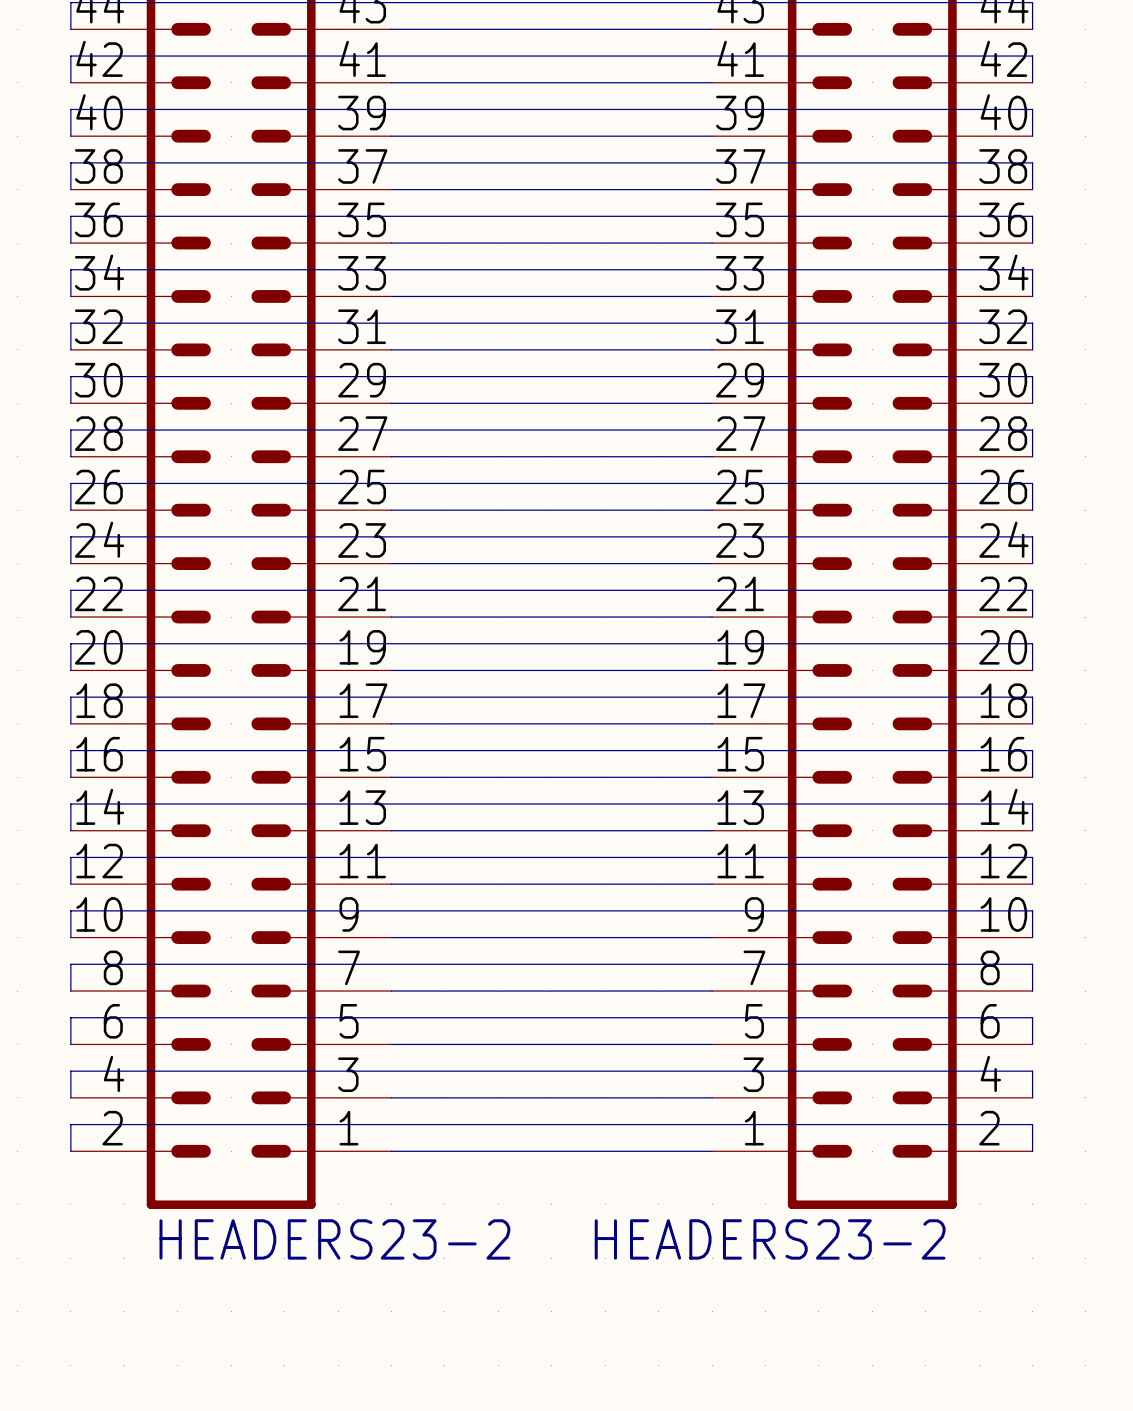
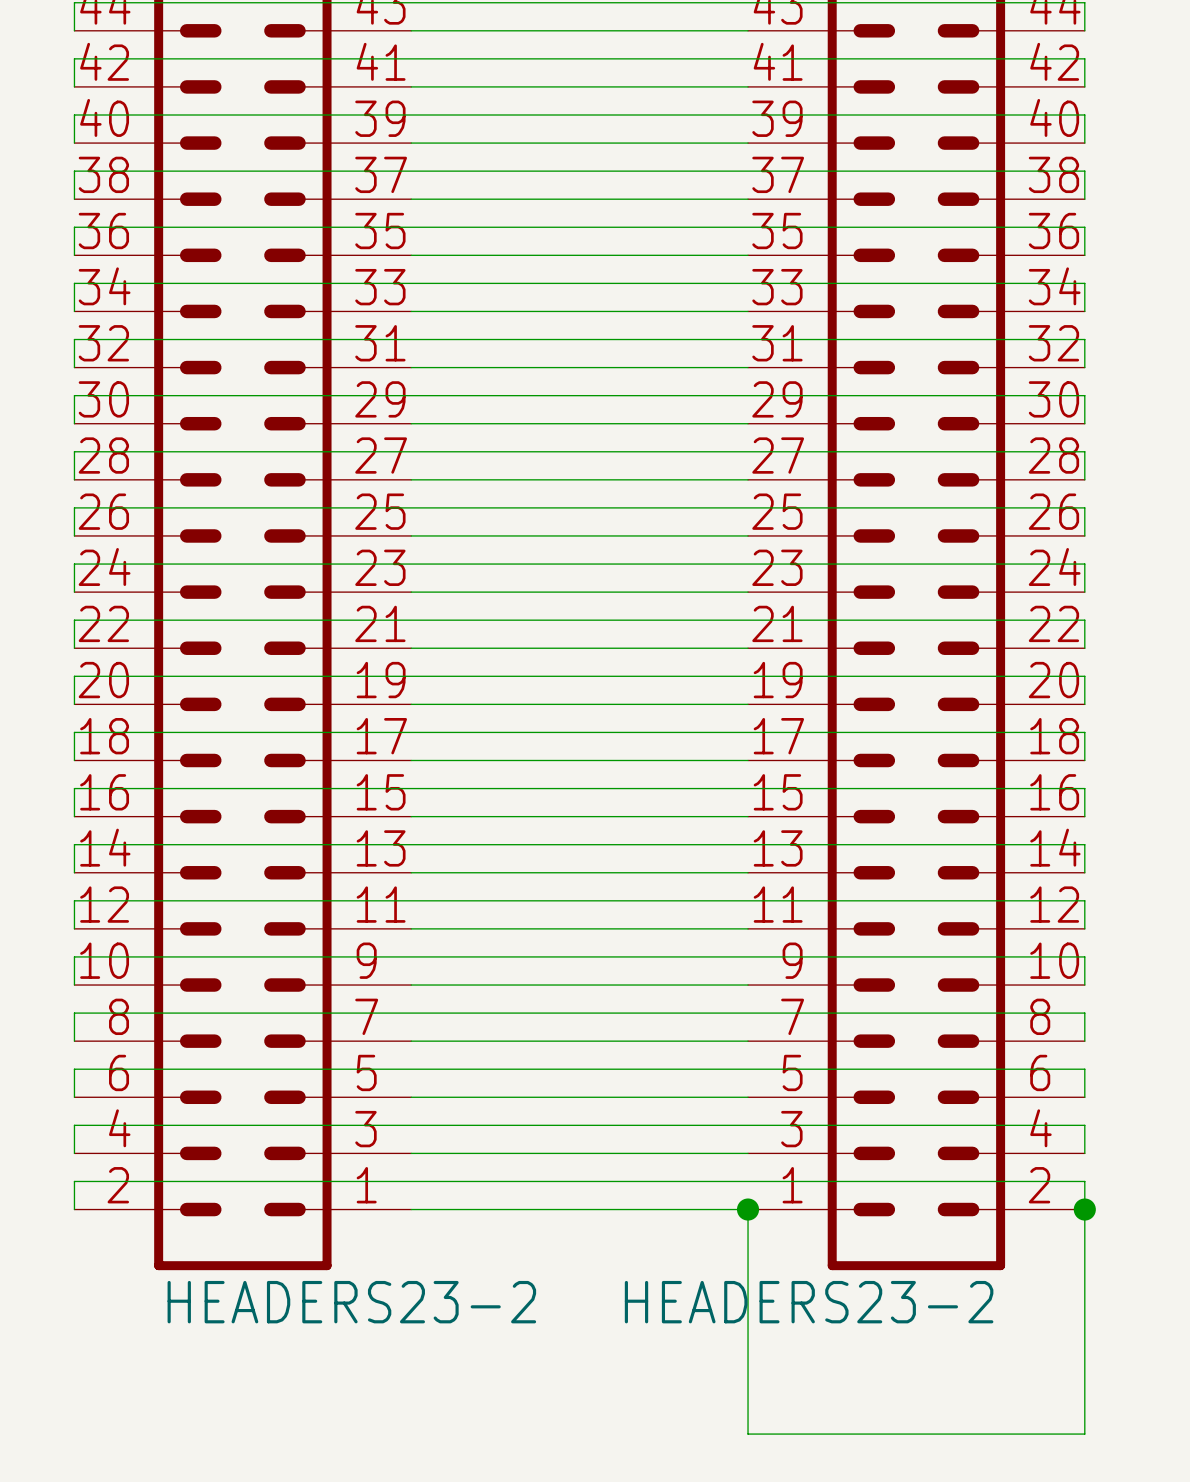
wire: none -> (748, 1209) (748, 1434) (1084, 1434) (1084, 1209)
junction: none -> (748, 1209)
junction: none -> (1084, 1209)

